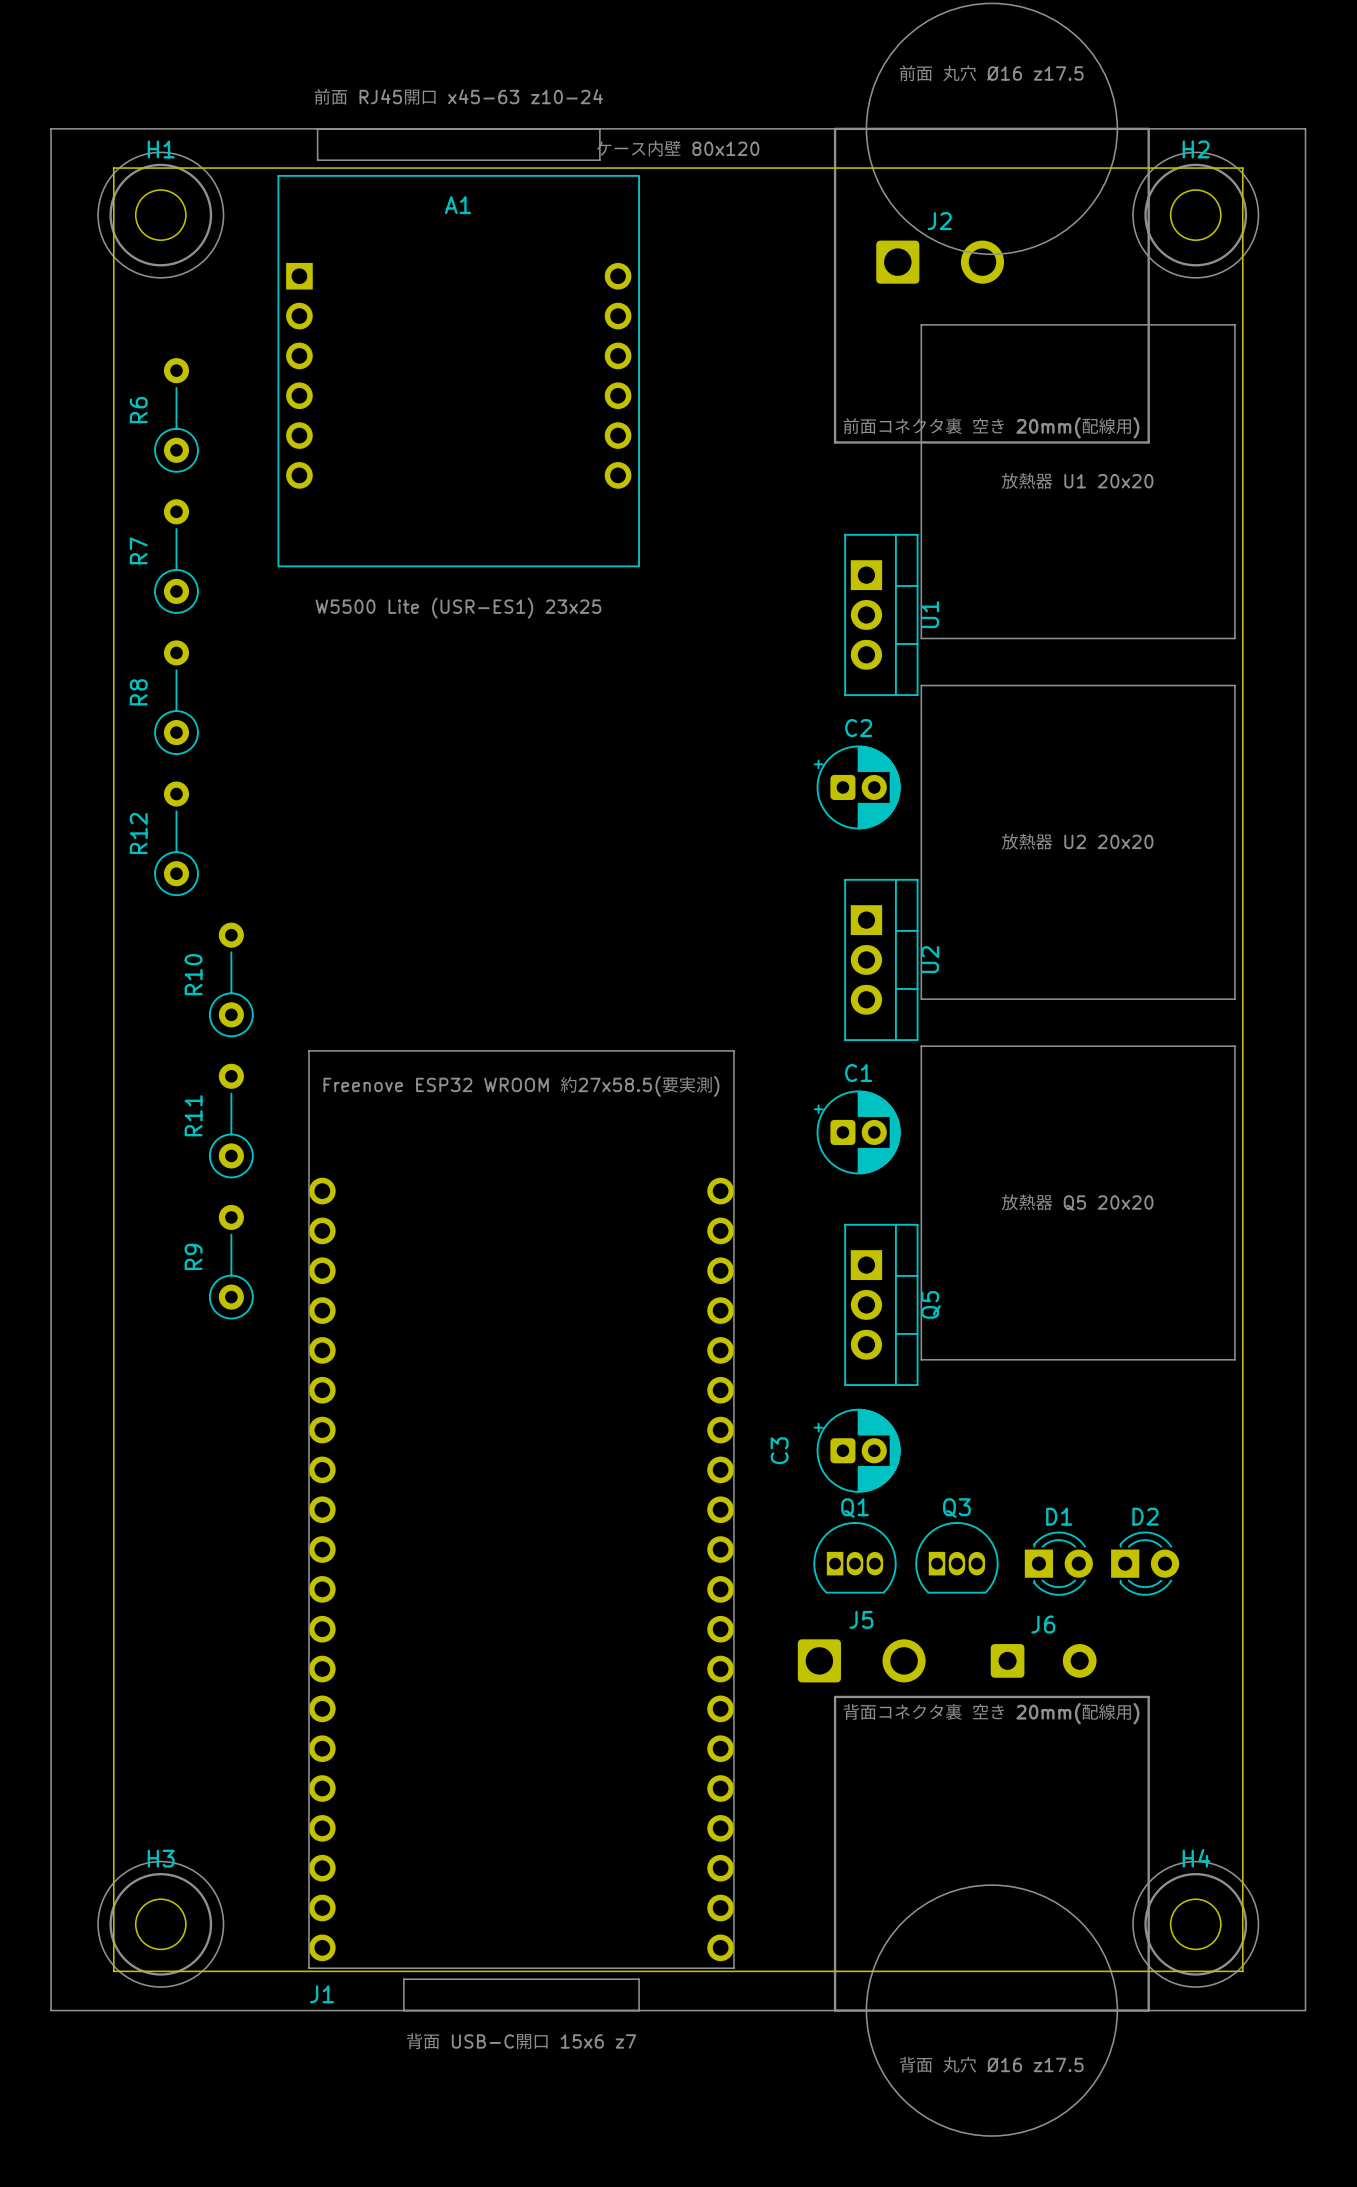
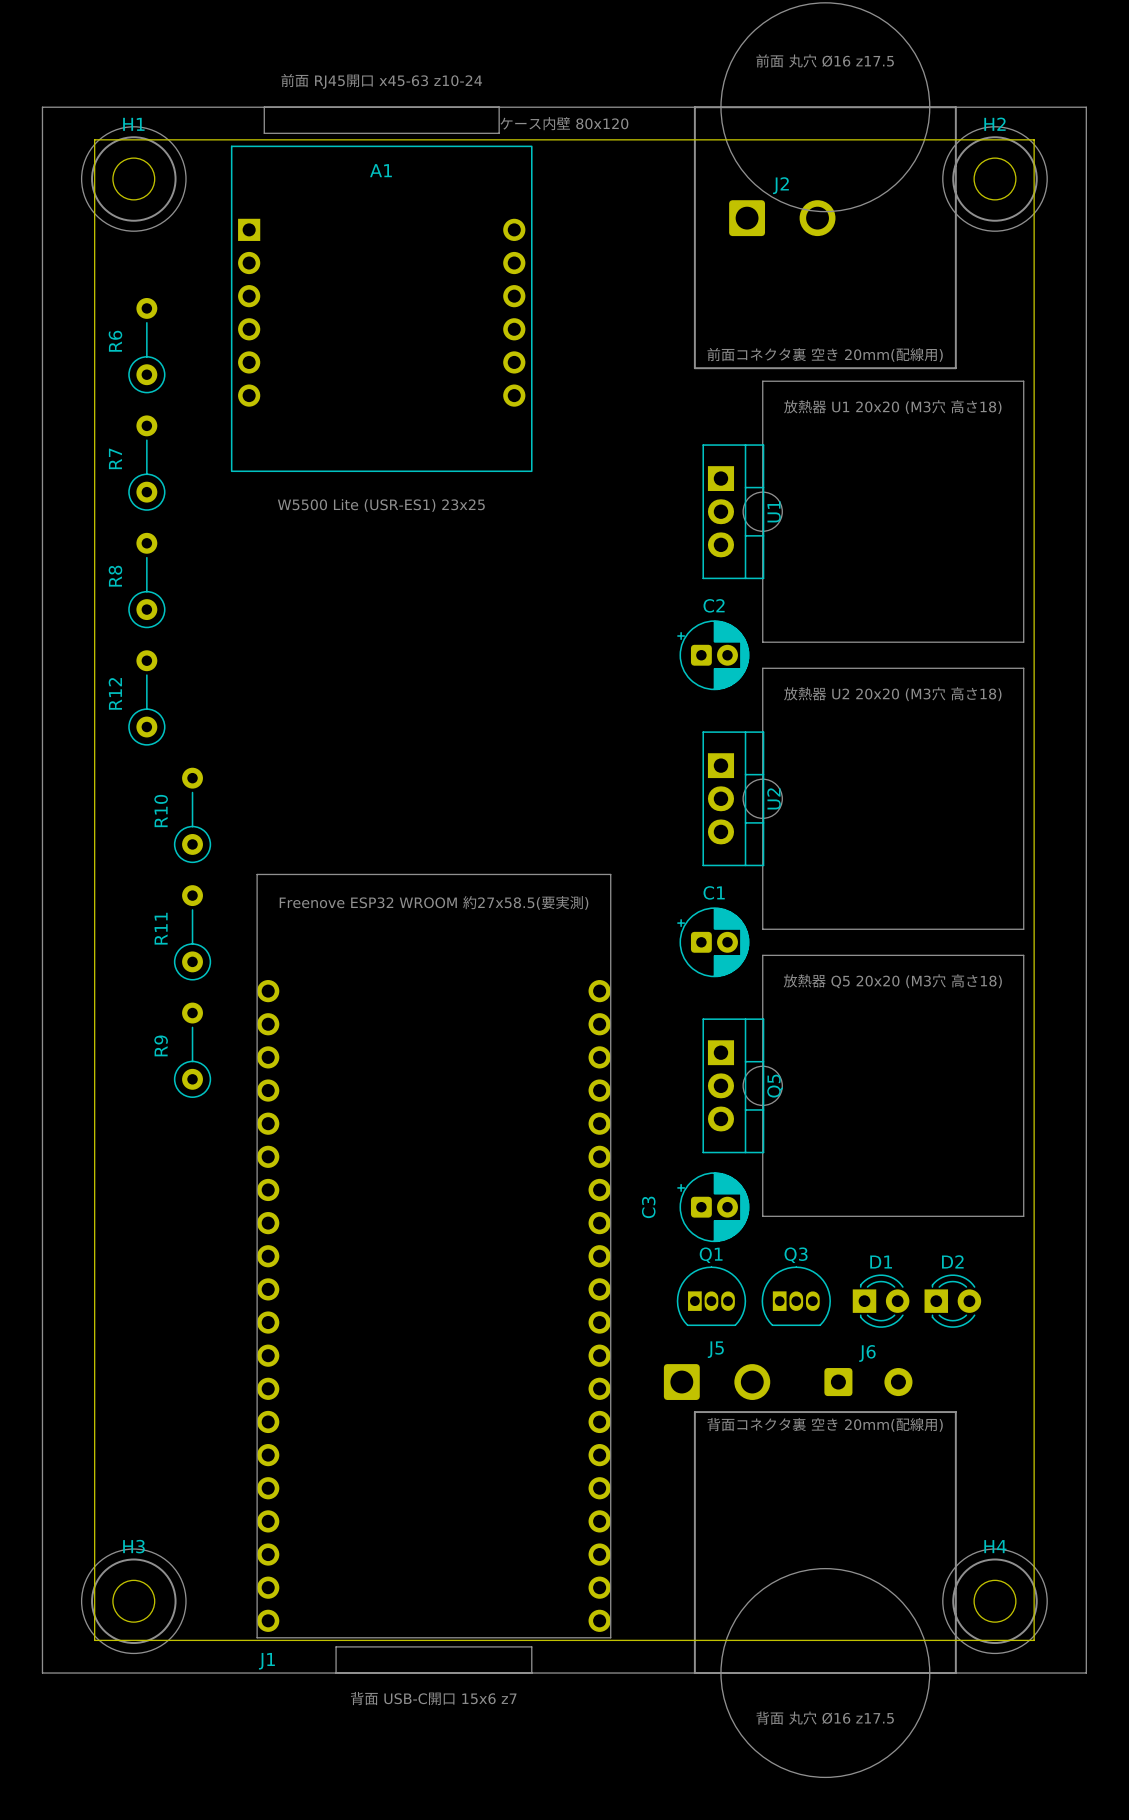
line: (921, 324) (1234, 324) (1234, 638) (921, 638) (921, 324) -> (762, 381) (1023, 381) (1023, 642) (762, 642) (762, 381)
text: 放熱器 U1 20x20 (1077, 480) -> 放熱器 U1 20x20 (M3穴 高さ18) (892, 407)
drawing: none -> [742, 491, 783, 532]
line: (921, 685) (921, 999) (1234, 999) (1234, 685) (921, 685) -> (762, 668) (762, 929) (1023, 929) (1023, 668) (762, 668)
text: 放熱器 U2 20x20 (1077, 841) -> 放熱器 U2 20x20 (M3穴 高さ18) (892, 694)
drawing: none -> [742, 778, 783, 820]
line: (921, 1046) (921, 1359) (1234, 1359) (1234, 1046) (921, 1046) -> (762, 955) (762, 1216) (1023, 1216) (1023, 955) (762, 955)
text: 放熱器 Q5 20x20 (1077, 1202) -> 放熱器 Q5 20x20 (M3穴 高さ18) (892, 981)
drawing: none -> [742, 1065, 783, 1107]

